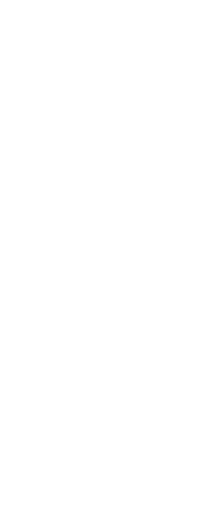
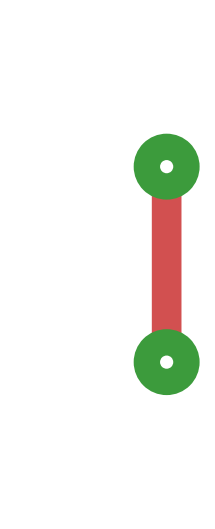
track: none -> (166, 166) (166, 362)
via: none -> (166, 166)
via: none -> (166, 362)

